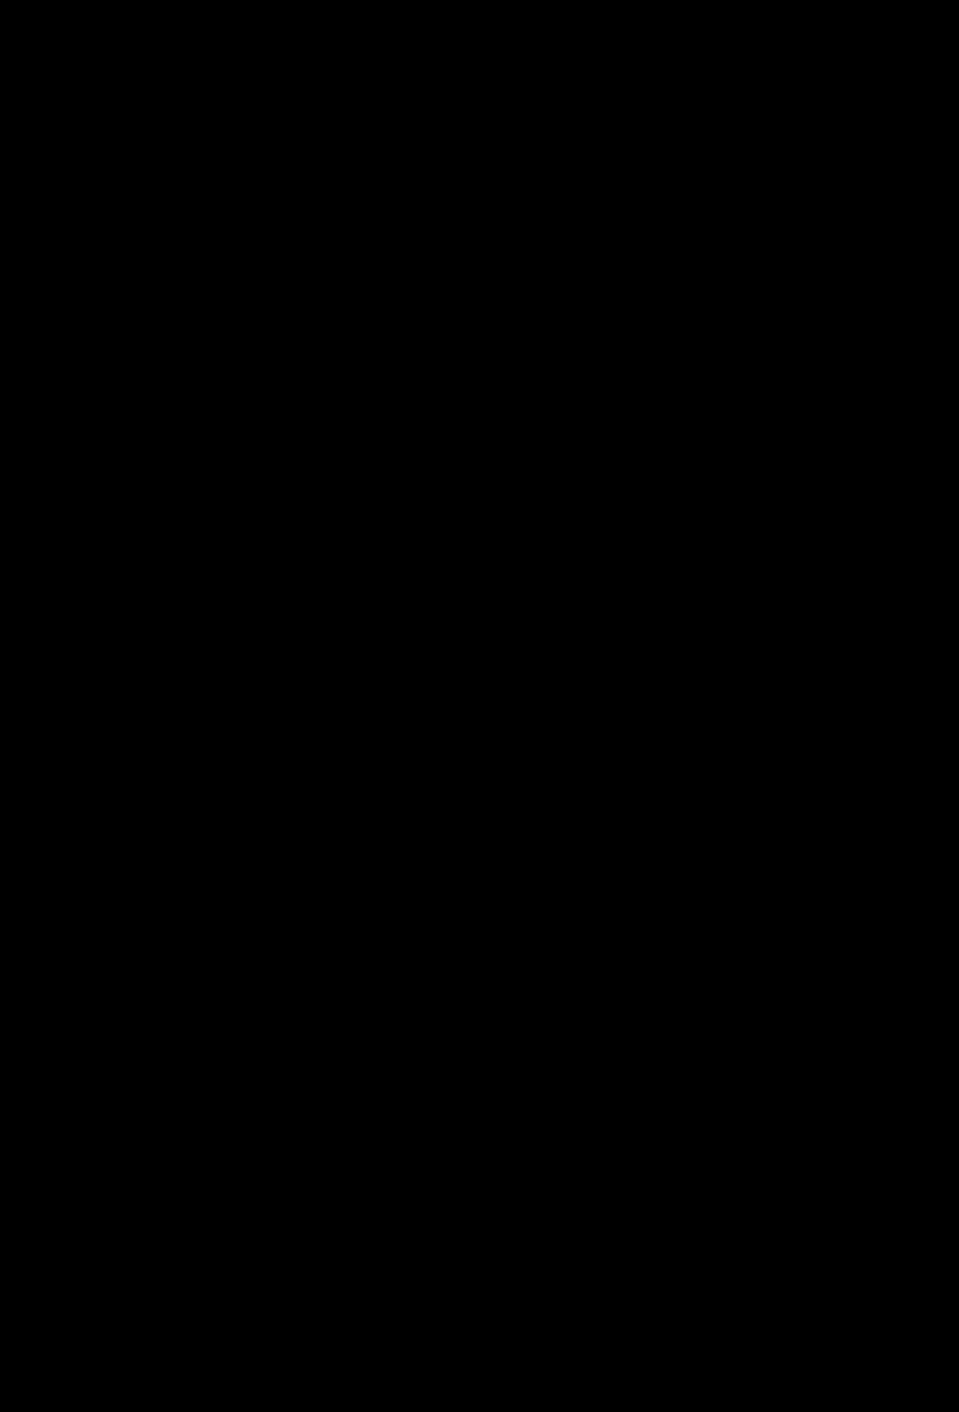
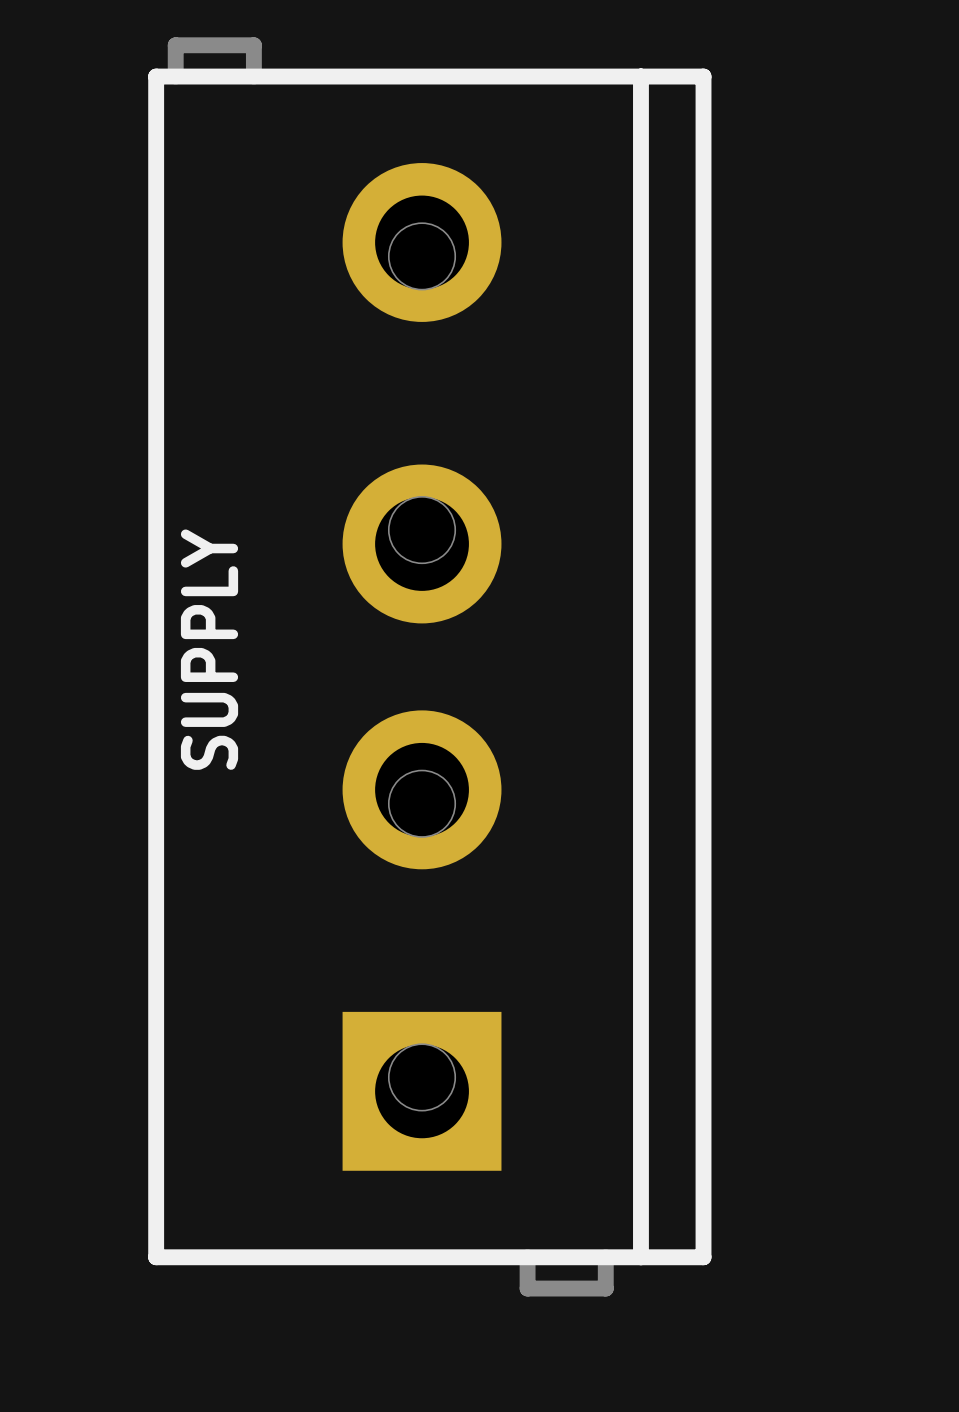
SUPPLY: none -> (429, 666)

